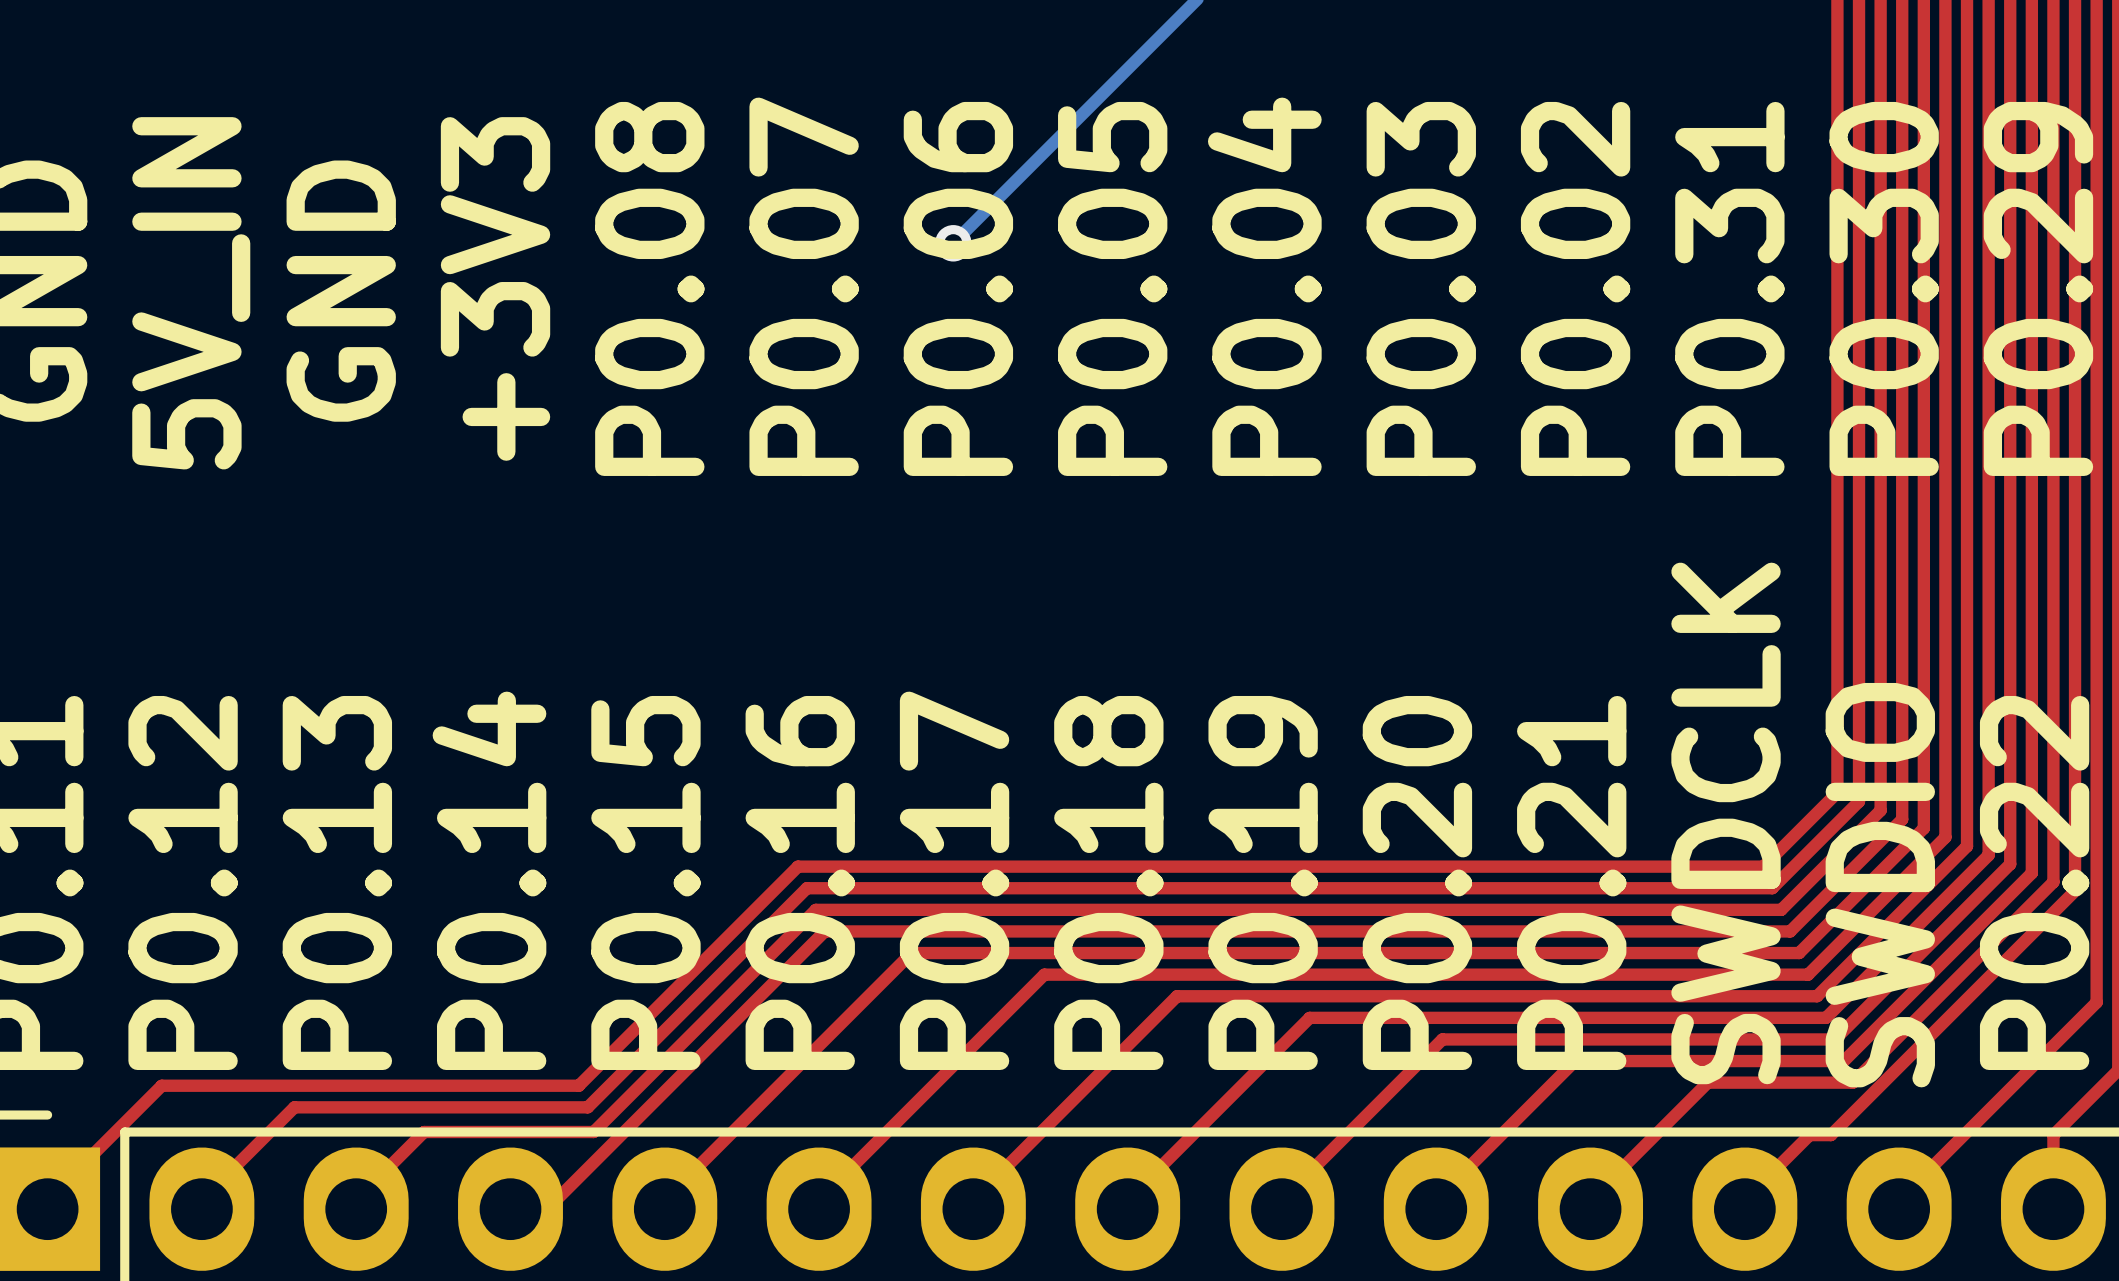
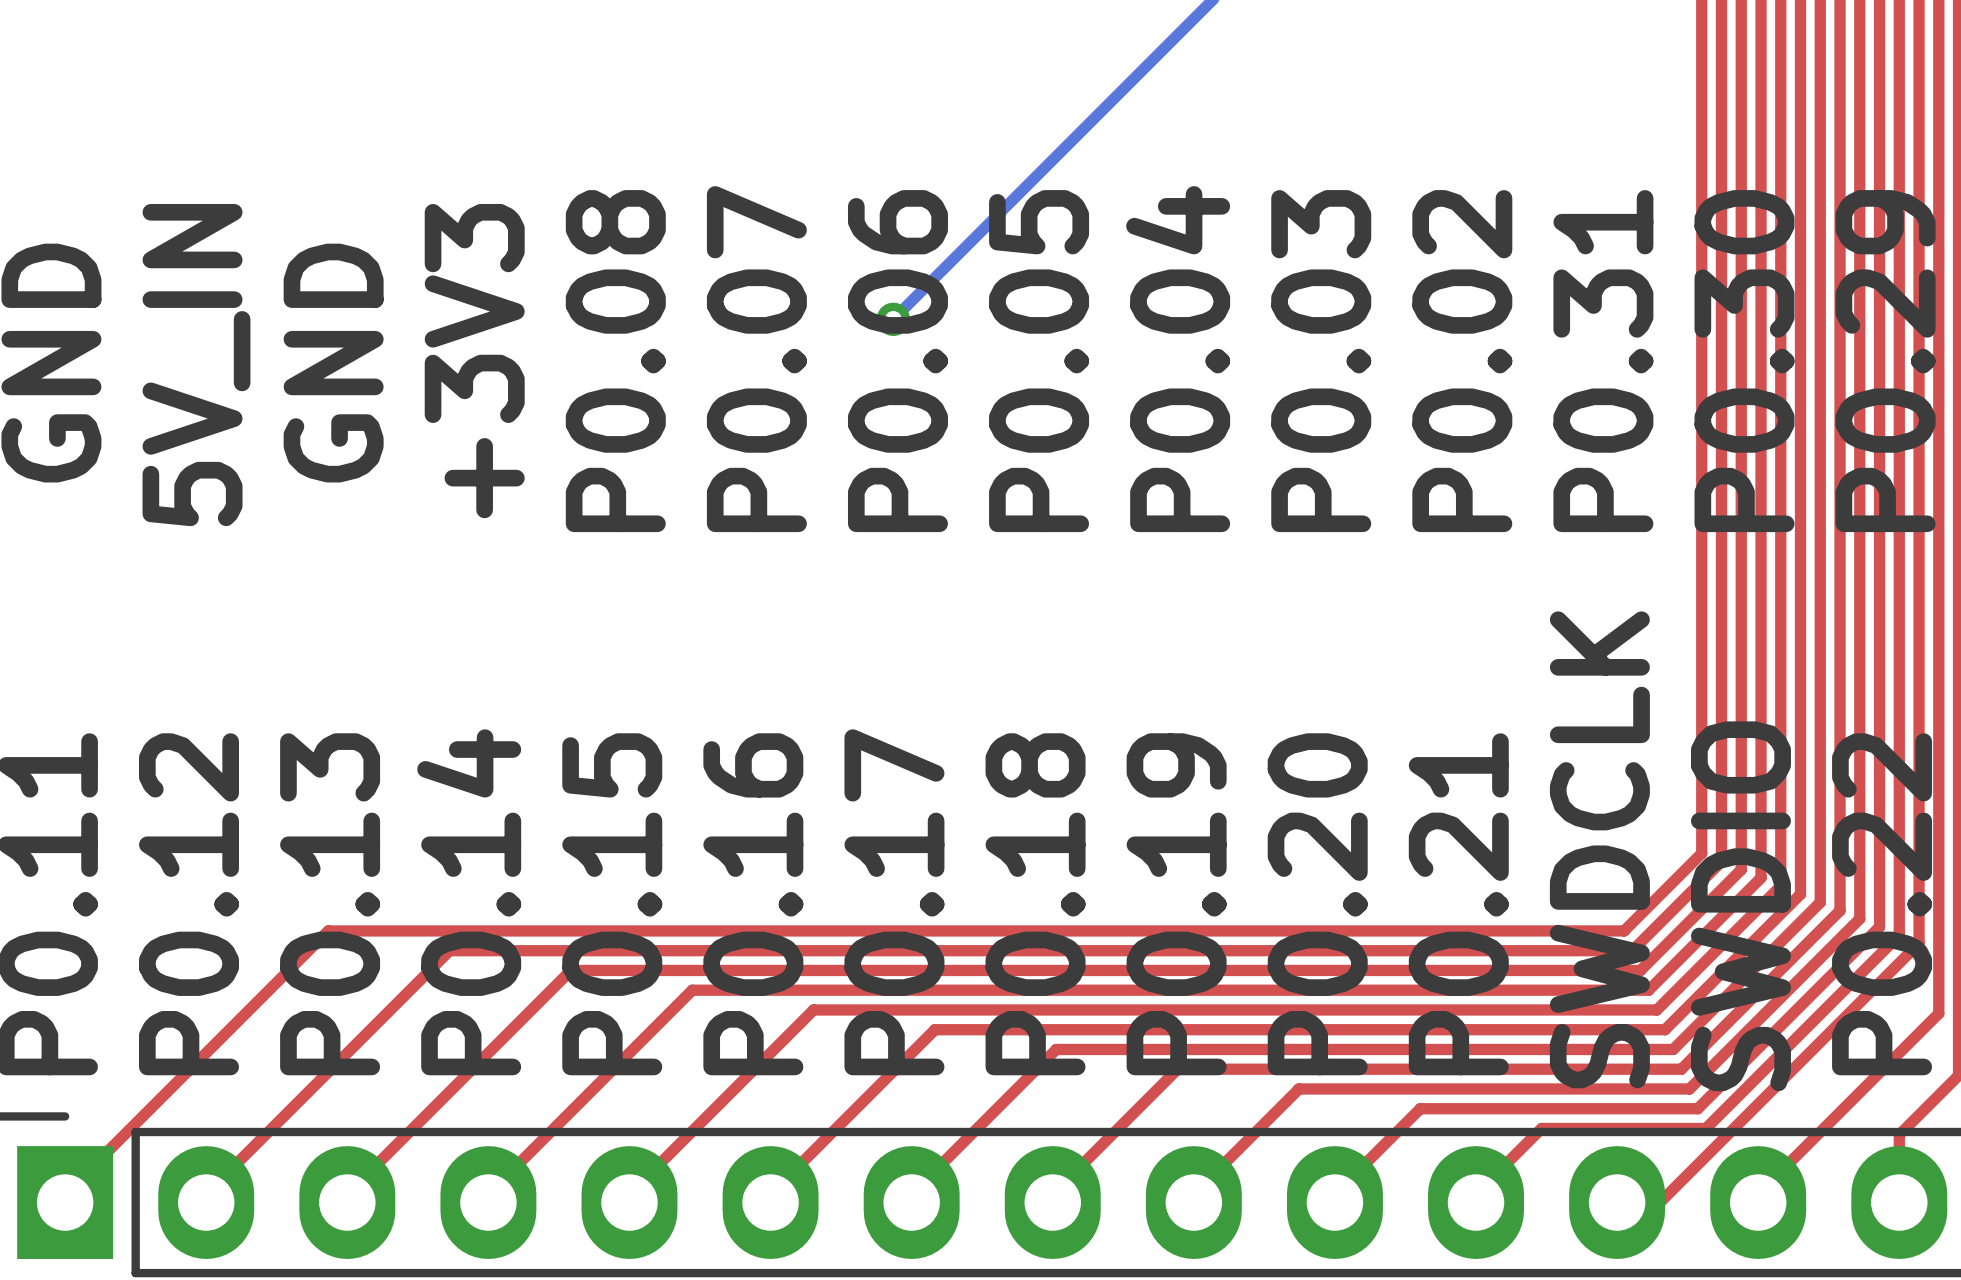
top track: (1837, 792) (1763, 866) (797, 866) (578, 1085) (161, 1085) -> (1701, 821) (1701, 853) (1624, 930) (328, 930) (169, 1089)
top track: (1859, 801) (1772, 888) (806, 888) (587, 1107) (294, 1107) -> (1721, 829) (1721, 861) (1632, 950) (449, 950) (290, 1109)
top track: (1880, 810) (1781, 909) (815, 909) (593, 1132) (424, 1132) -> (1741, 837) (1741, 869) (1640, 970) (570, 970) (409, 1132)
top track: (1902, 819) (1790, 931) (824, 931) (547, 1209) (510, 1209) -> (1761, 846) (1761, 877) (1648, 990) (692, 990) (488, 1194) (488, 1202)
top track: (1923, 828) (1799, 953) (911, 953) (866, 998) -> (1780, 854) (1780, 886) (1656, 1009) (813, 1009)
top track: (1945, 837) (1808, 974) (1044, 974) (998, 1020) -> (1800, 862) (1800, 894) (1665, 1029) (934, 1029)
top track: (1967, 846) (1817, 996) (1177, 996) (1131, 1041) -> (1820, 870) (1820, 902) (1673, 1049) (1056, 1049)
top track: (1988, 855) (1826, 1017) (1309, 1017) (1264, 1063) -> (1840, 878) (1840, 910) (1681, 1069) (1177, 1069)
top track: (2010, 864) (1834, 1039) (1442, 1039) (1396, 1084) -> (1859, 887) (1859, 918) (1689, 1088) (1298, 1088)
top track: (2031, 873) (1843, 1061) (1575, 1061) (1529, 1106) -> (1879, 895) (1879, 927) (1697, 1108) (1420, 1108)
top track: (2053, 882) (1852, 1082) (1707, 1082) (1662, 1128) -> (1899, 903) (1899, 935) (1705, 1128) (1541, 1128)
top track: (2075, 891) (1830, 1135) (1809, 1135) (1744, 1199) (1744, 1209) -> (1919, 911) (1919, 943) (1659, 1202) (1617, 1202)

